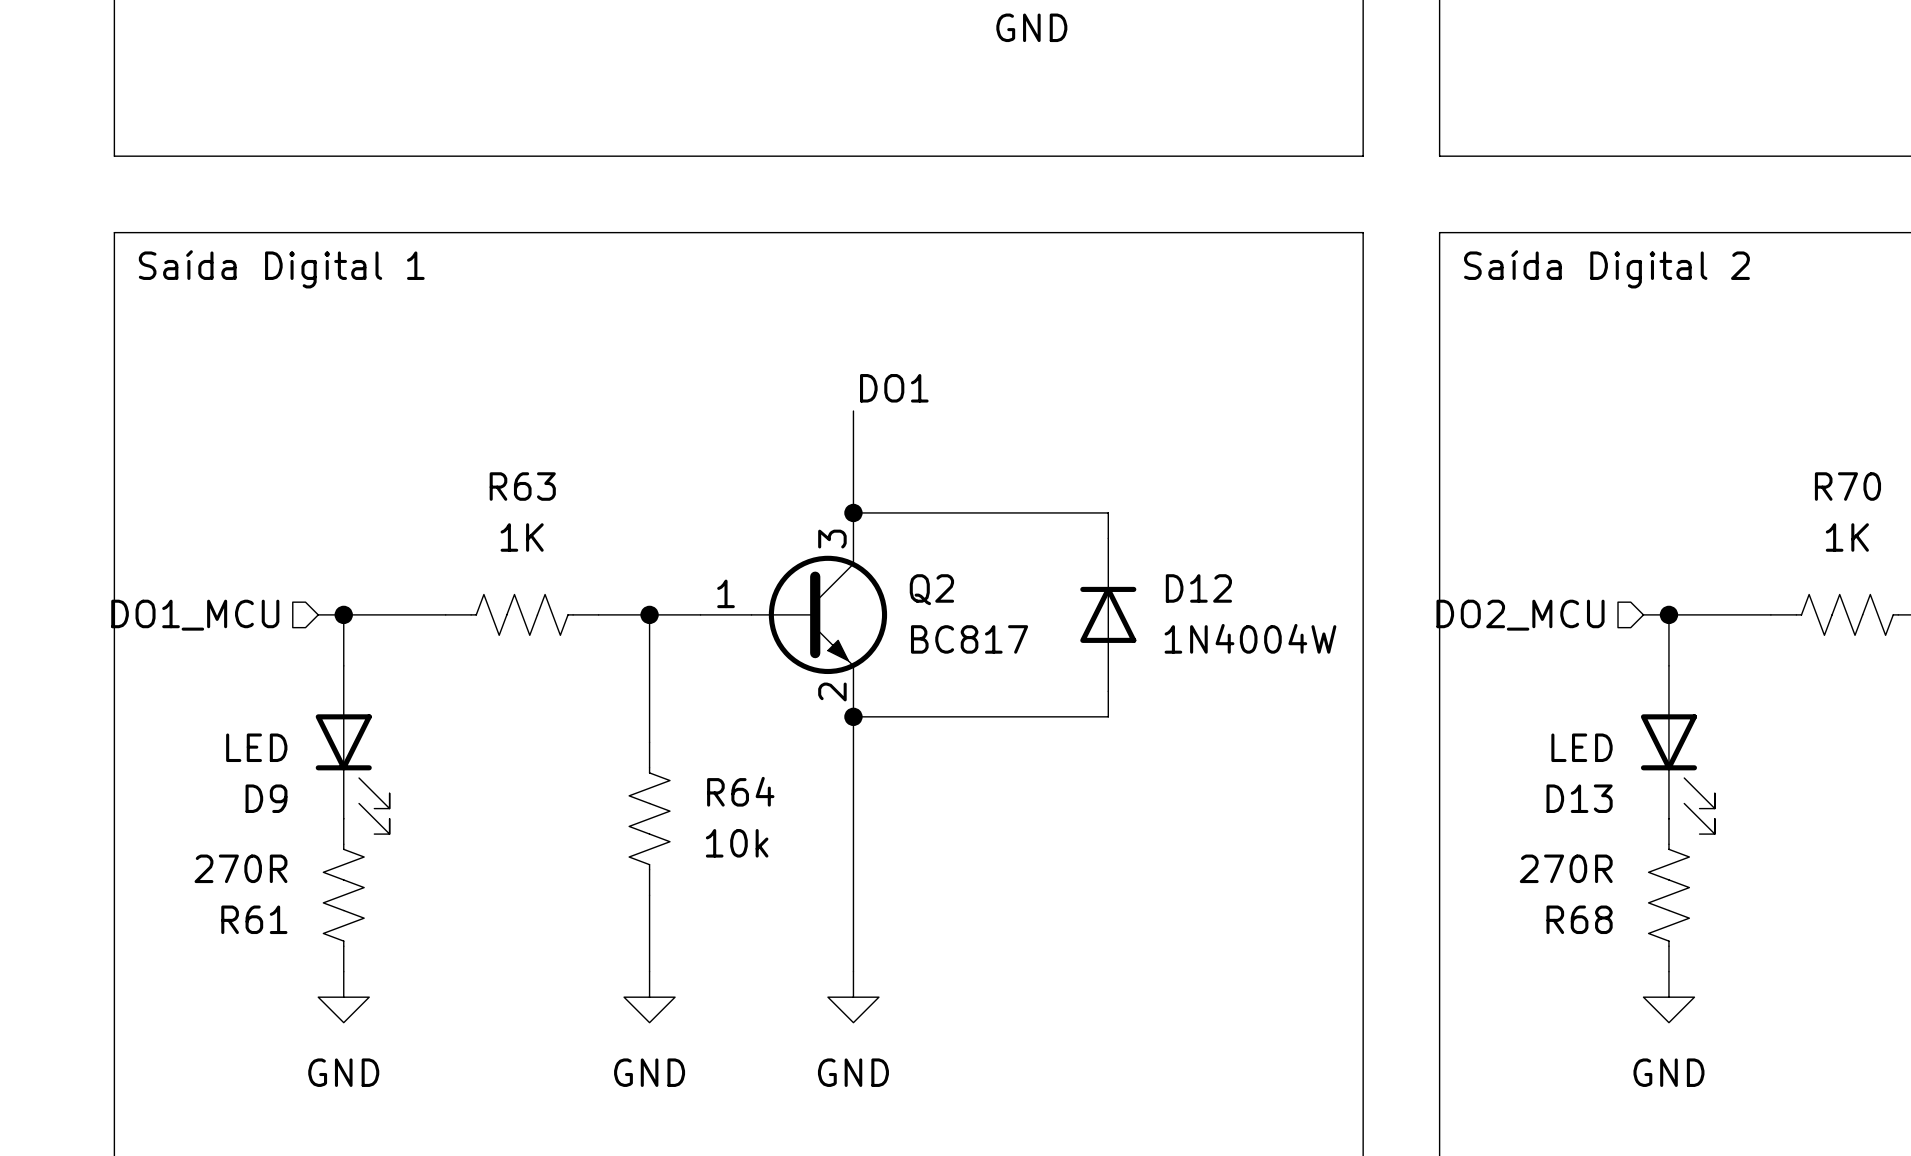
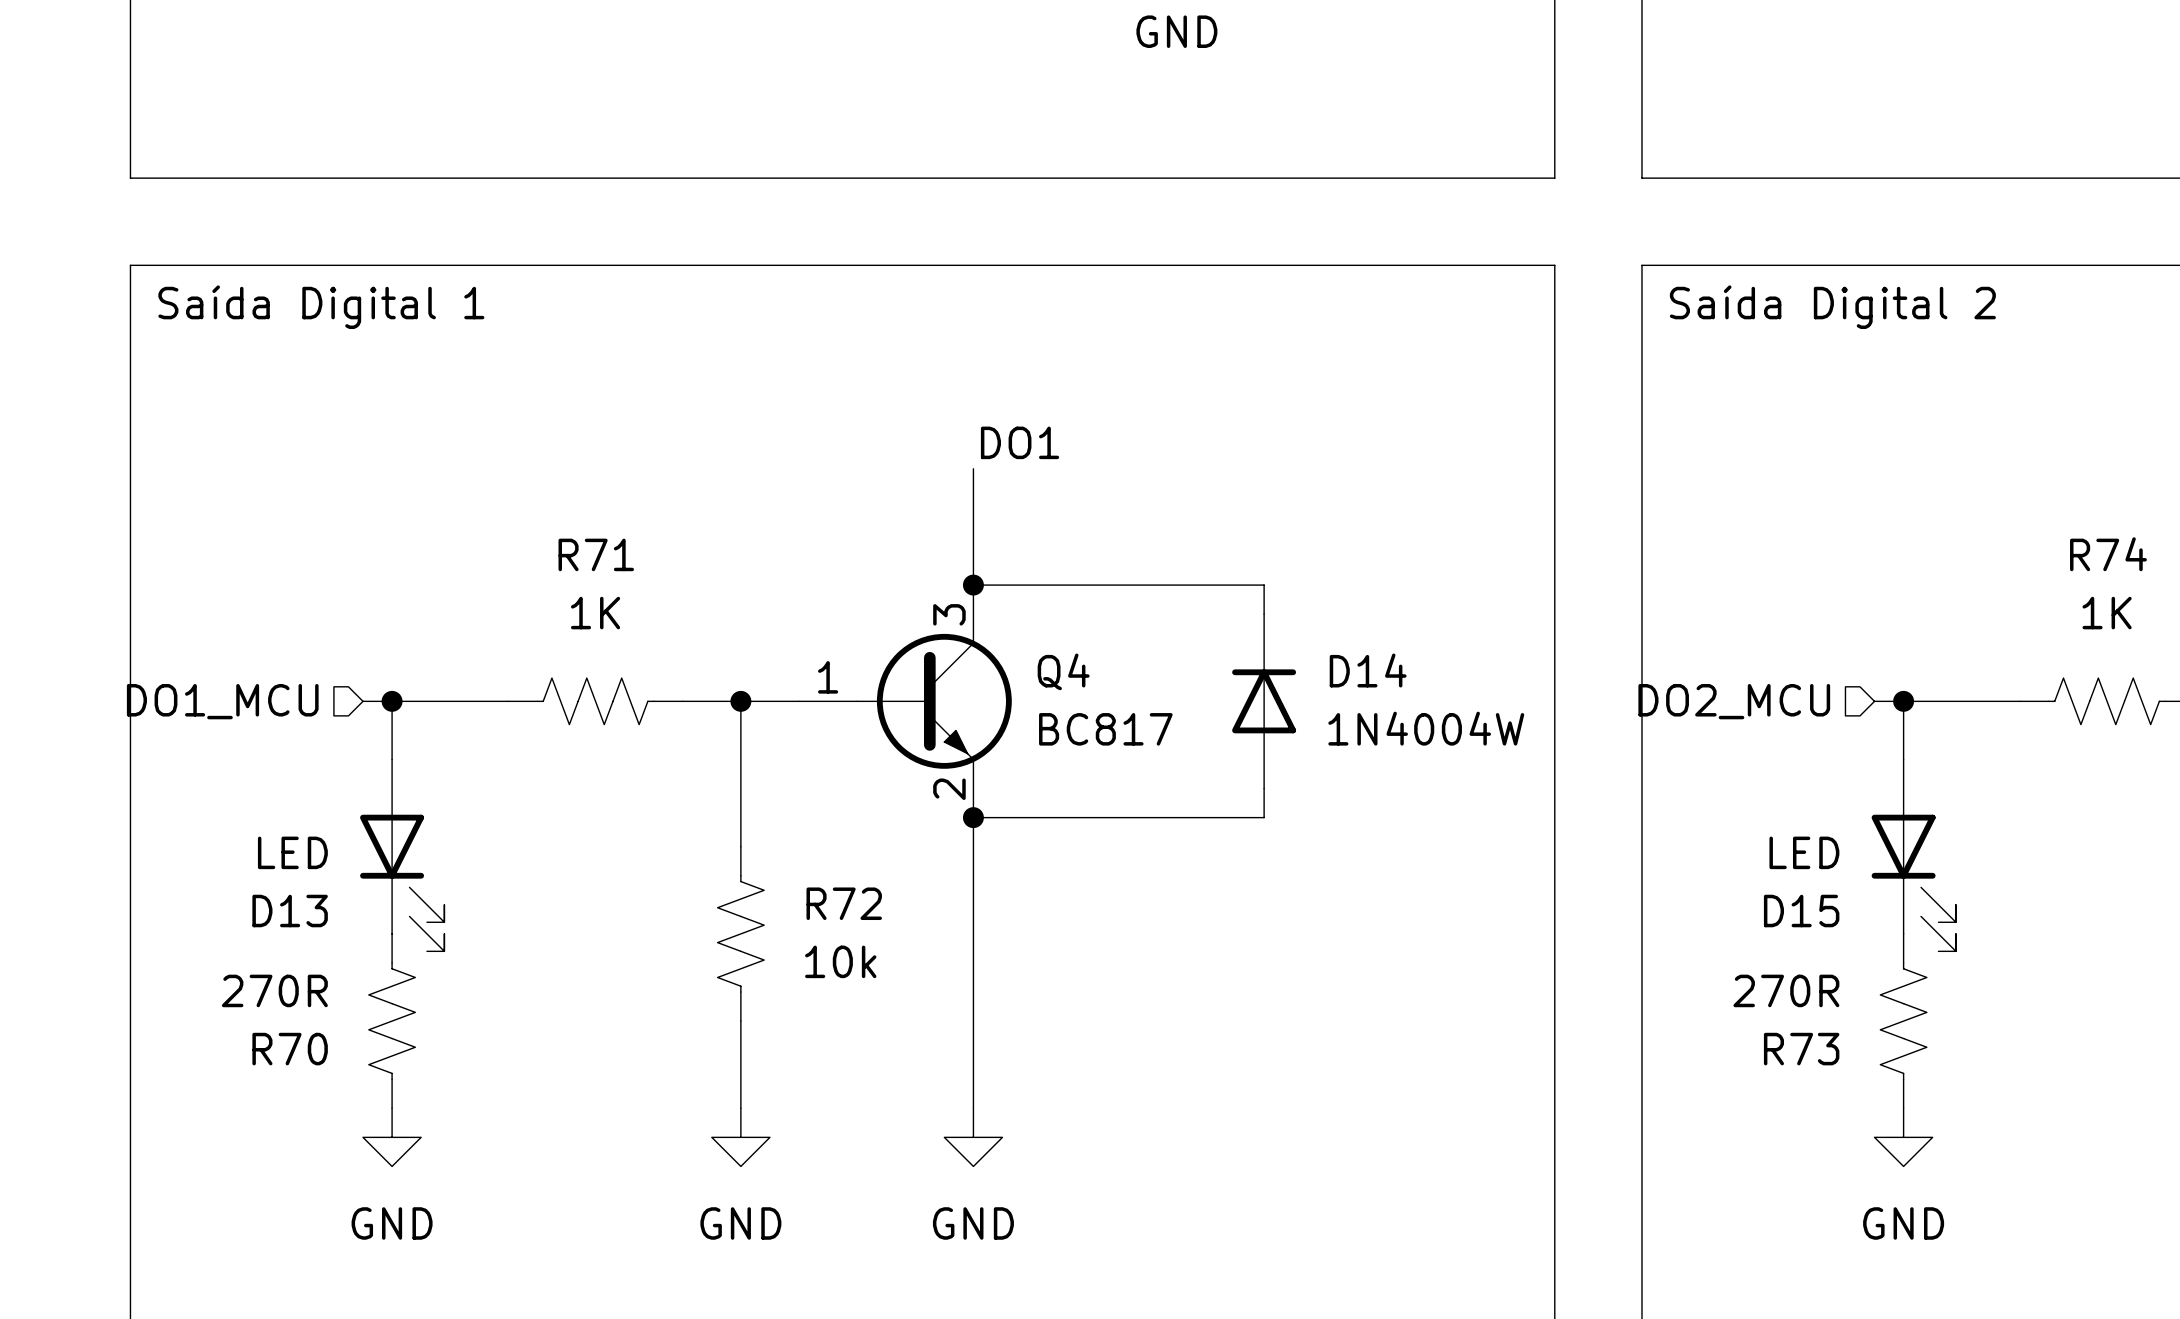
R63 name: R63 (522, 486) -> R71 (596, 554)
R70 name: R70 (1847, 486) -> R74 (2108, 554)
D12 name: D12 (1198, 588) -> D14 (1368, 670)
Q2 name: Q2 (931, 589) -> Q4 (1063, 671)
R64 name: R64 (740, 791) -> R72 (844, 903)
D9 name: D9 (266, 798) -> D13 (290, 911)
D13 name: D13 (1579, 798) -> D15 (1801, 911)
R61 name: R61 (254, 919) -> R70 (290, 1049)
R68 name: R68 (1579, 919) -> R73 (1801, 1049)

